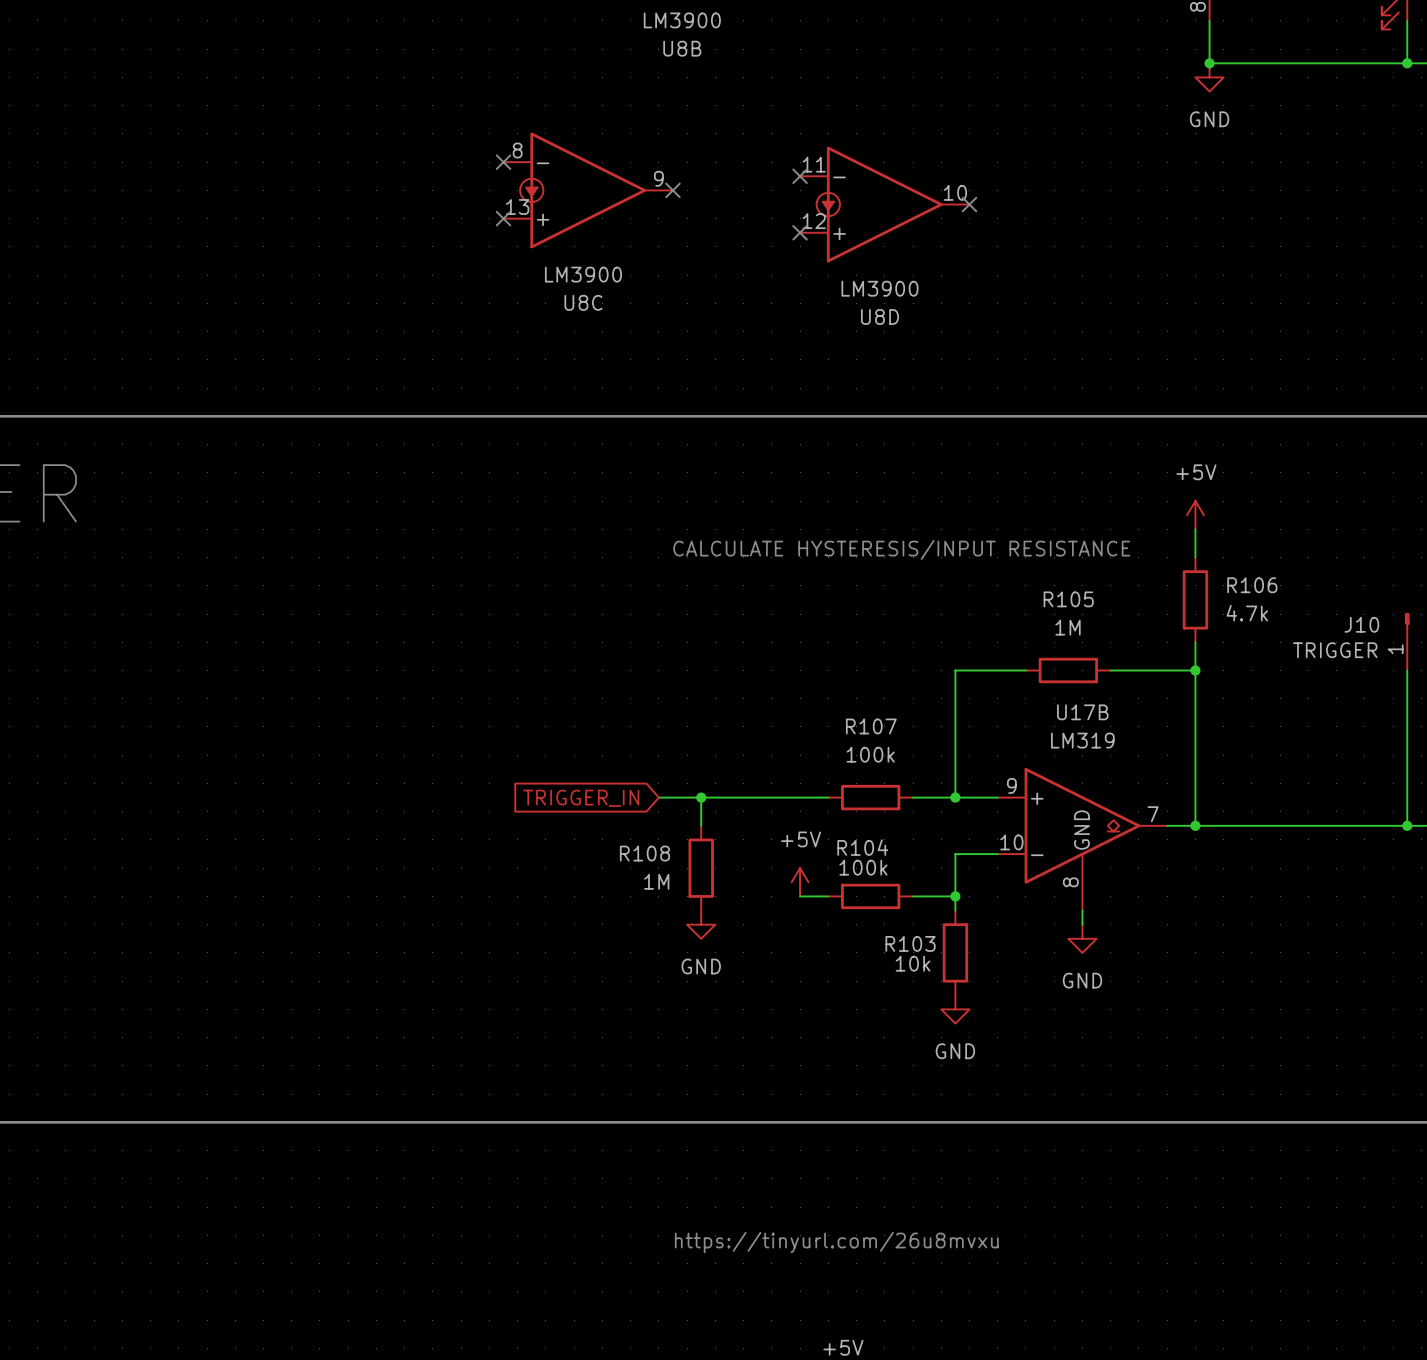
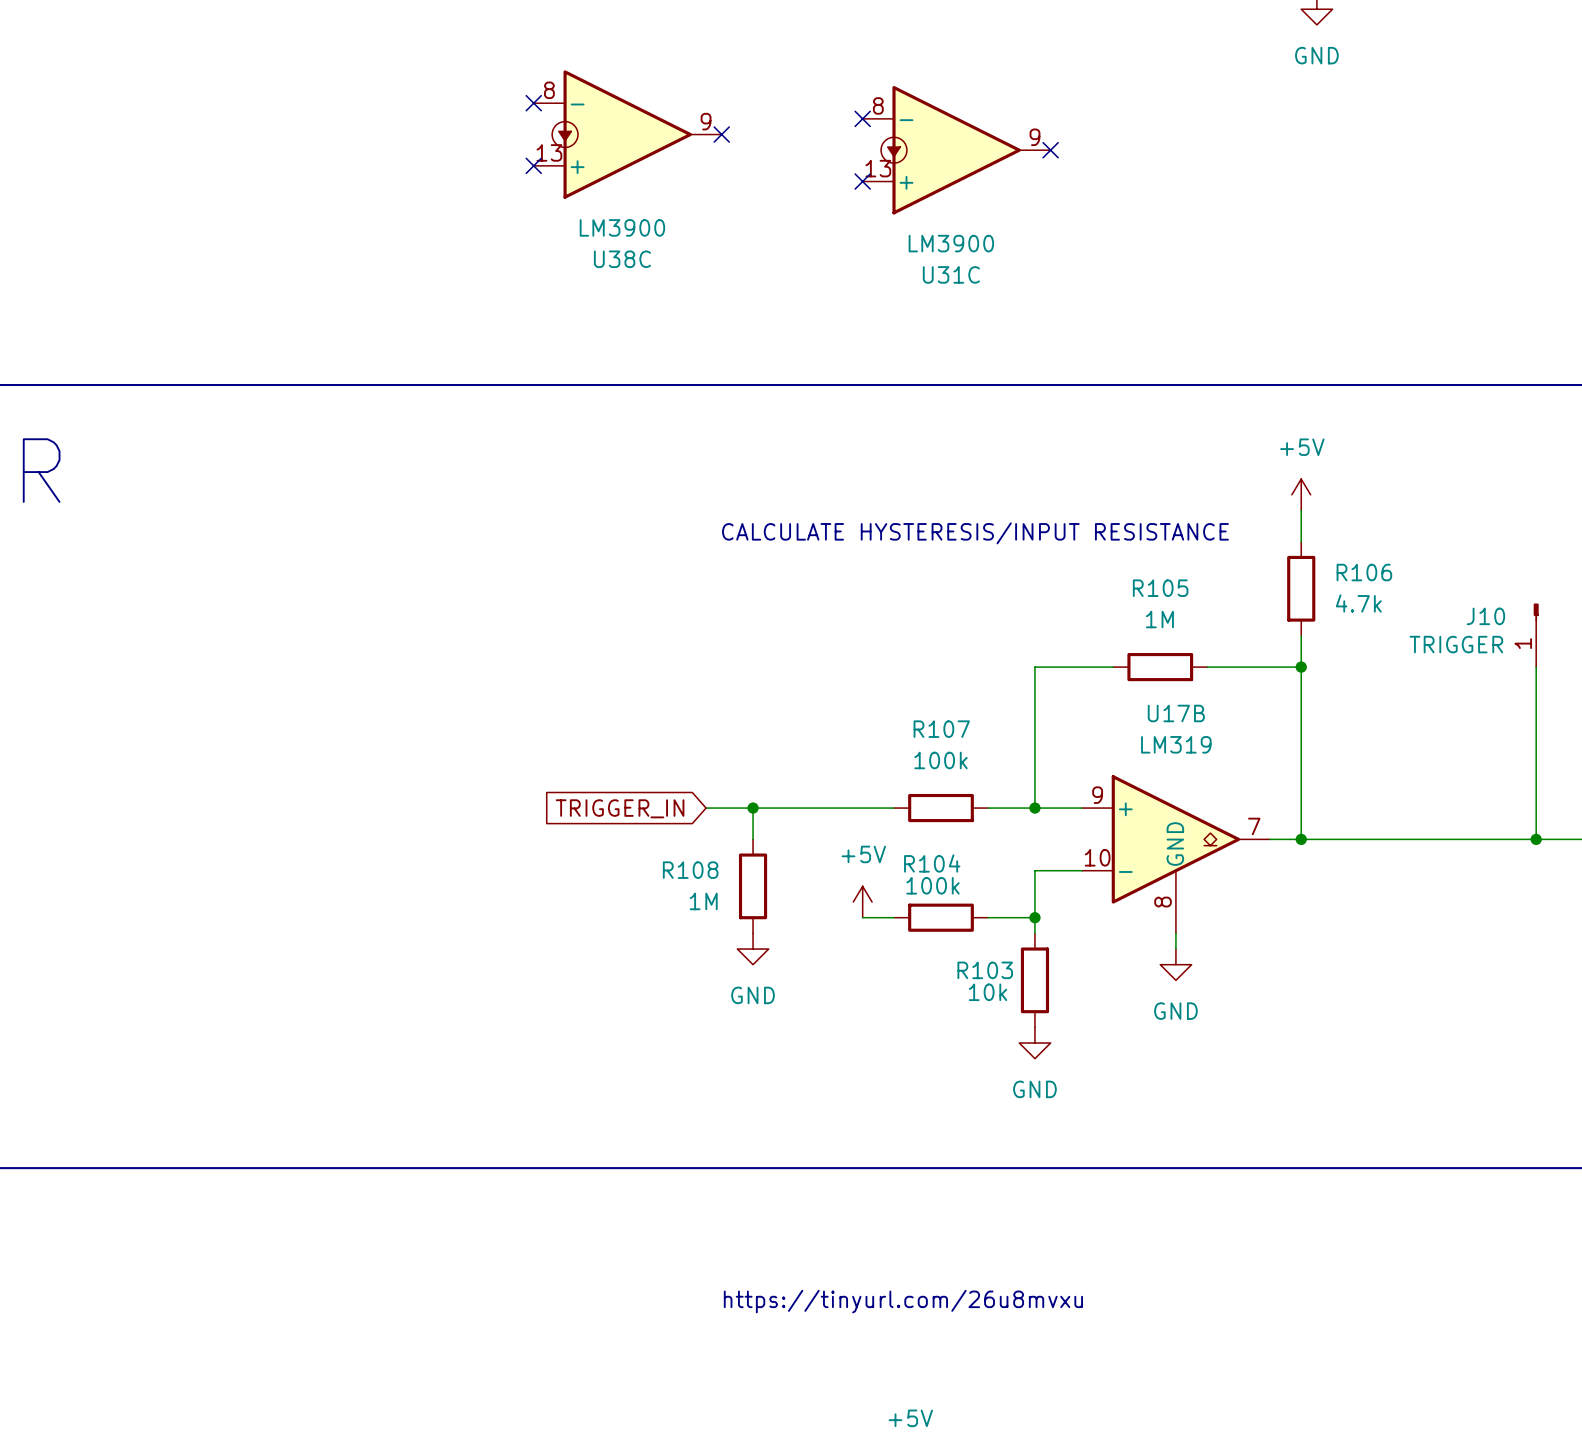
U8D pin number: 11 (814, 164) -> 8 (878, 105)
U8D pin number: 10 (955, 192) -> 9 (1034, 137)
U8D pin number: 12 (814, 221) -> 13 (878, 168)
U8C name: U8C (583, 302) -> U38C (622, 259)
U8D name: U8D (880, 316) -> U31C (951, 274)

